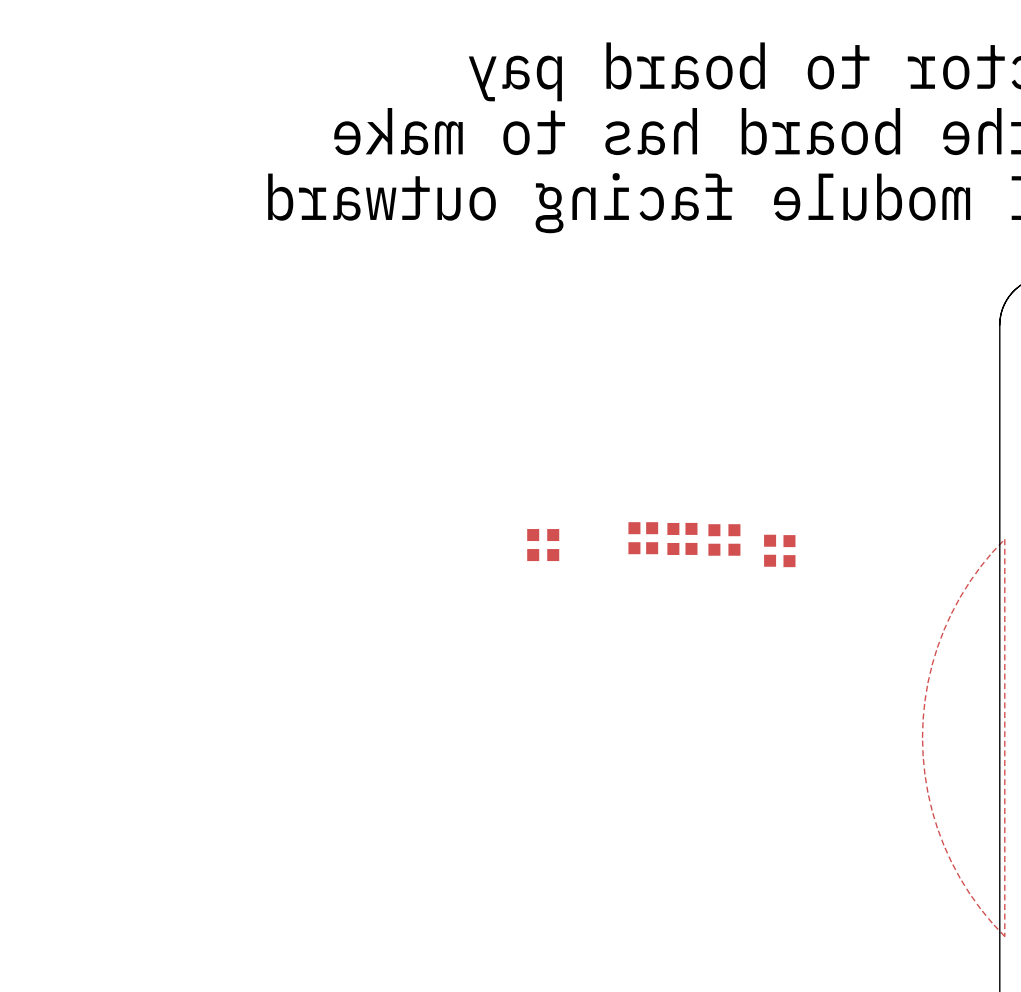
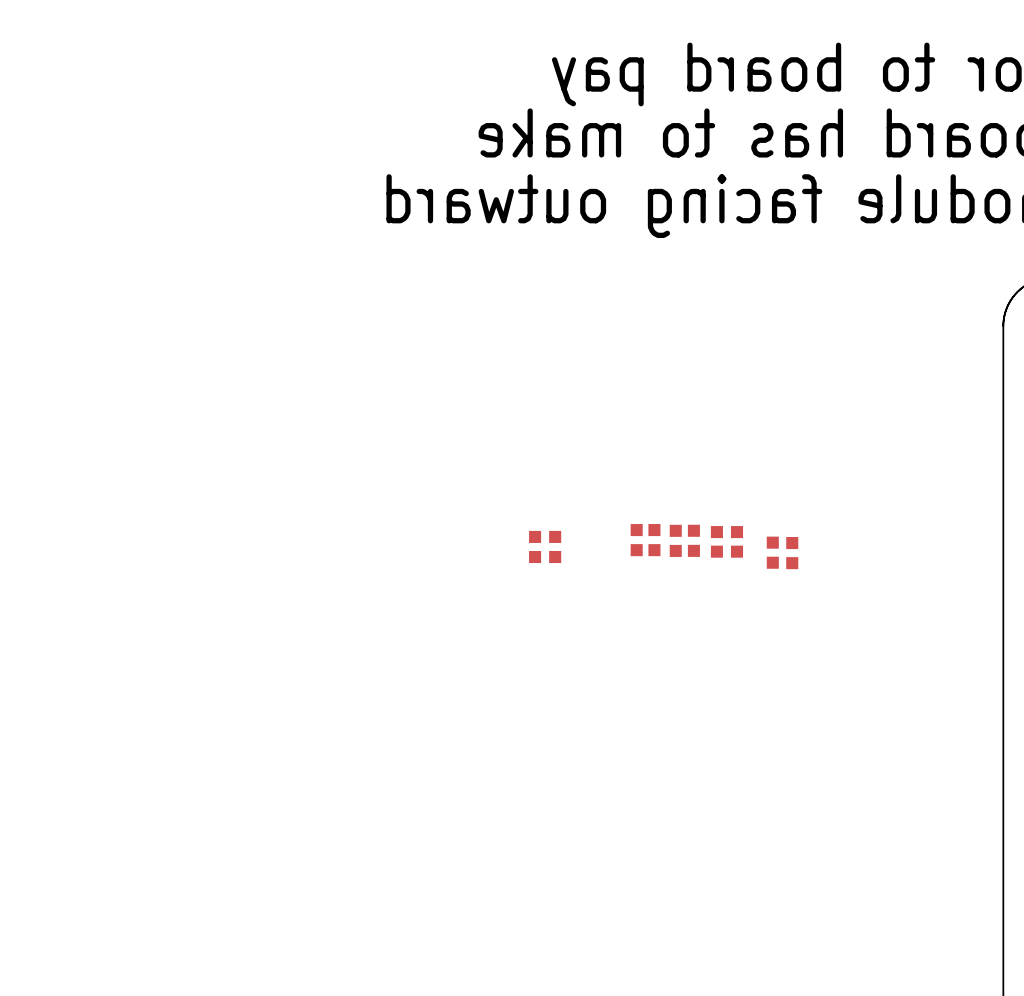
top zone outline: (1004, 539) (1004, 936) (969, 893) (943, 845) (927, 792) (922, 737) (927, 683) (943, 630) (969, 581) (1004, 539) -> none

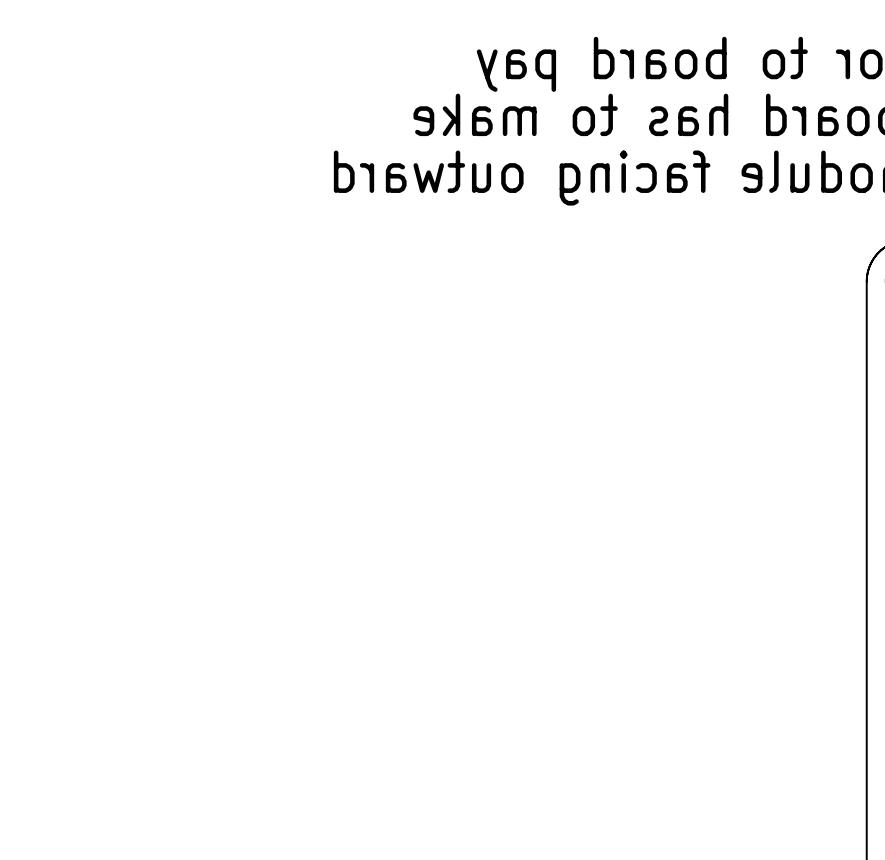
part: (726, 532) -> none
part: (545, 536) -> none
part: (636, 540) -> none
part: (654, 540) -> none
part: (675, 540) -> none
part: (693, 540) -> none
part: (726, 551) -> none
part: (772, 552) -> none
part: (792, 553) -> none
part: (545, 557) -> none

